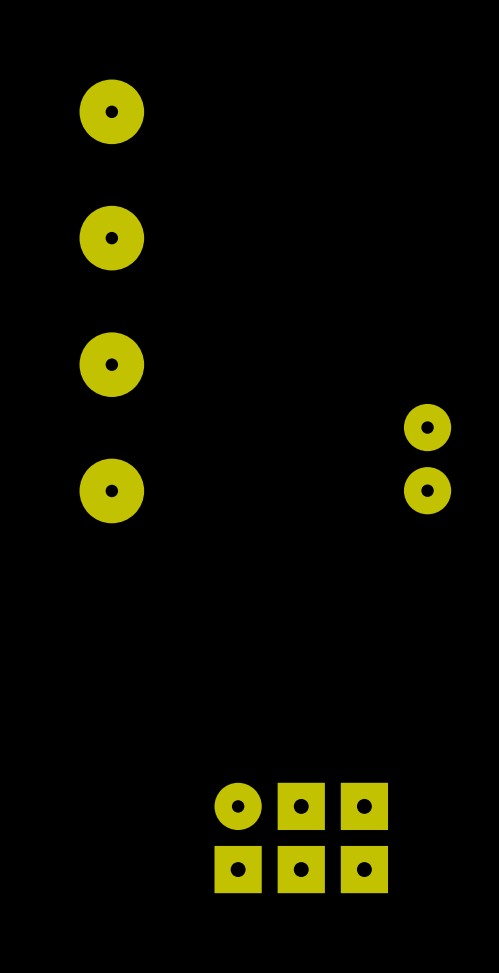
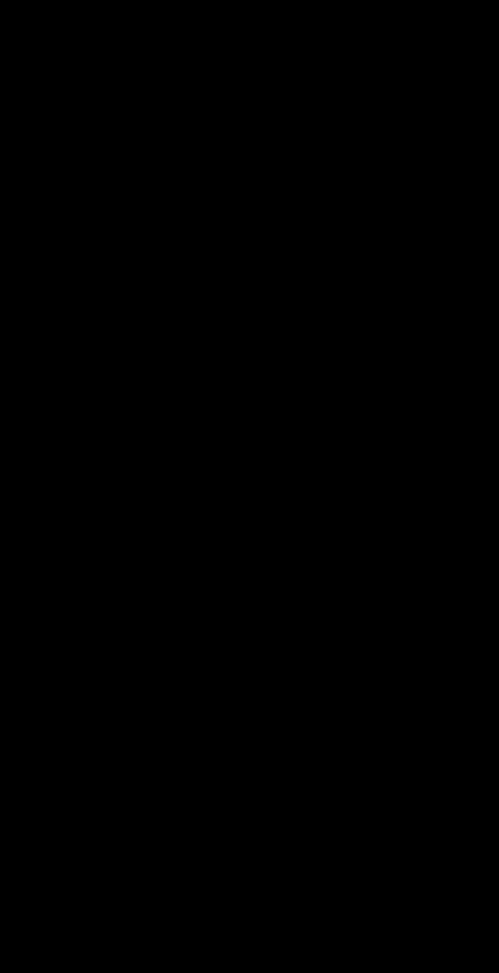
part: (111, 111) -> none
part: (111, 238) -> none
part: (111, 364) -> none
part: (427, 459) -> none
part: (111, 490) -> none
part: (238, 837) -> none
part: (332, 837) -> none

